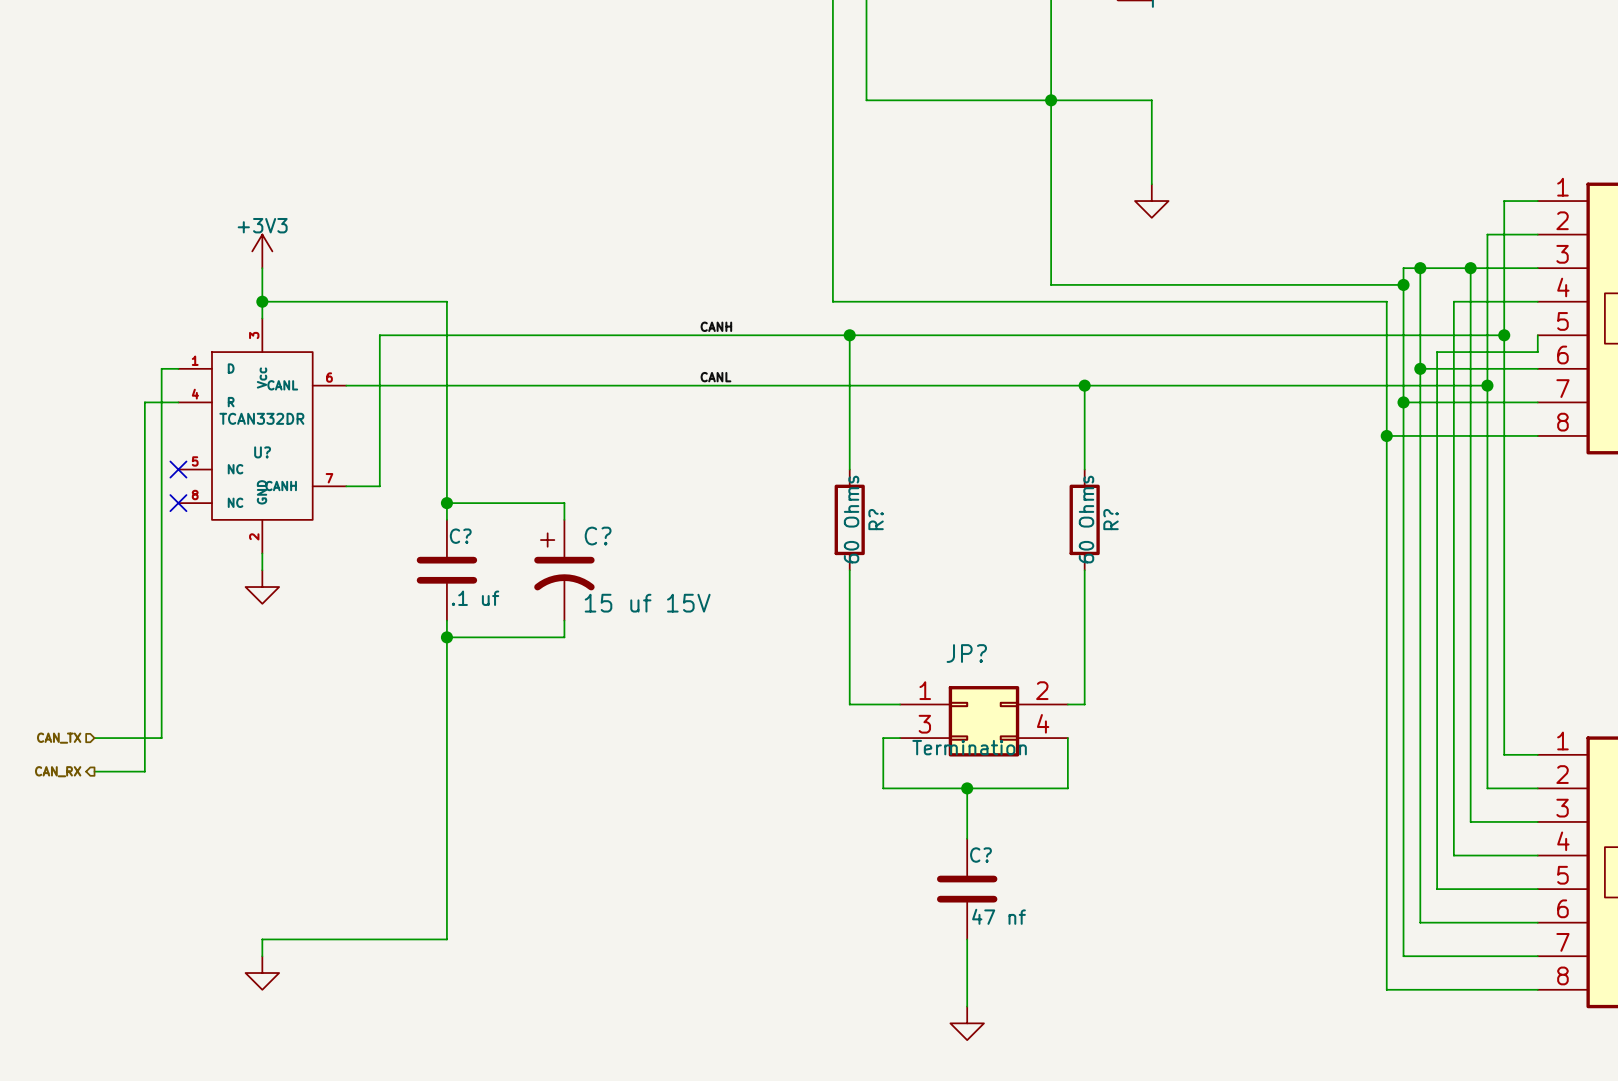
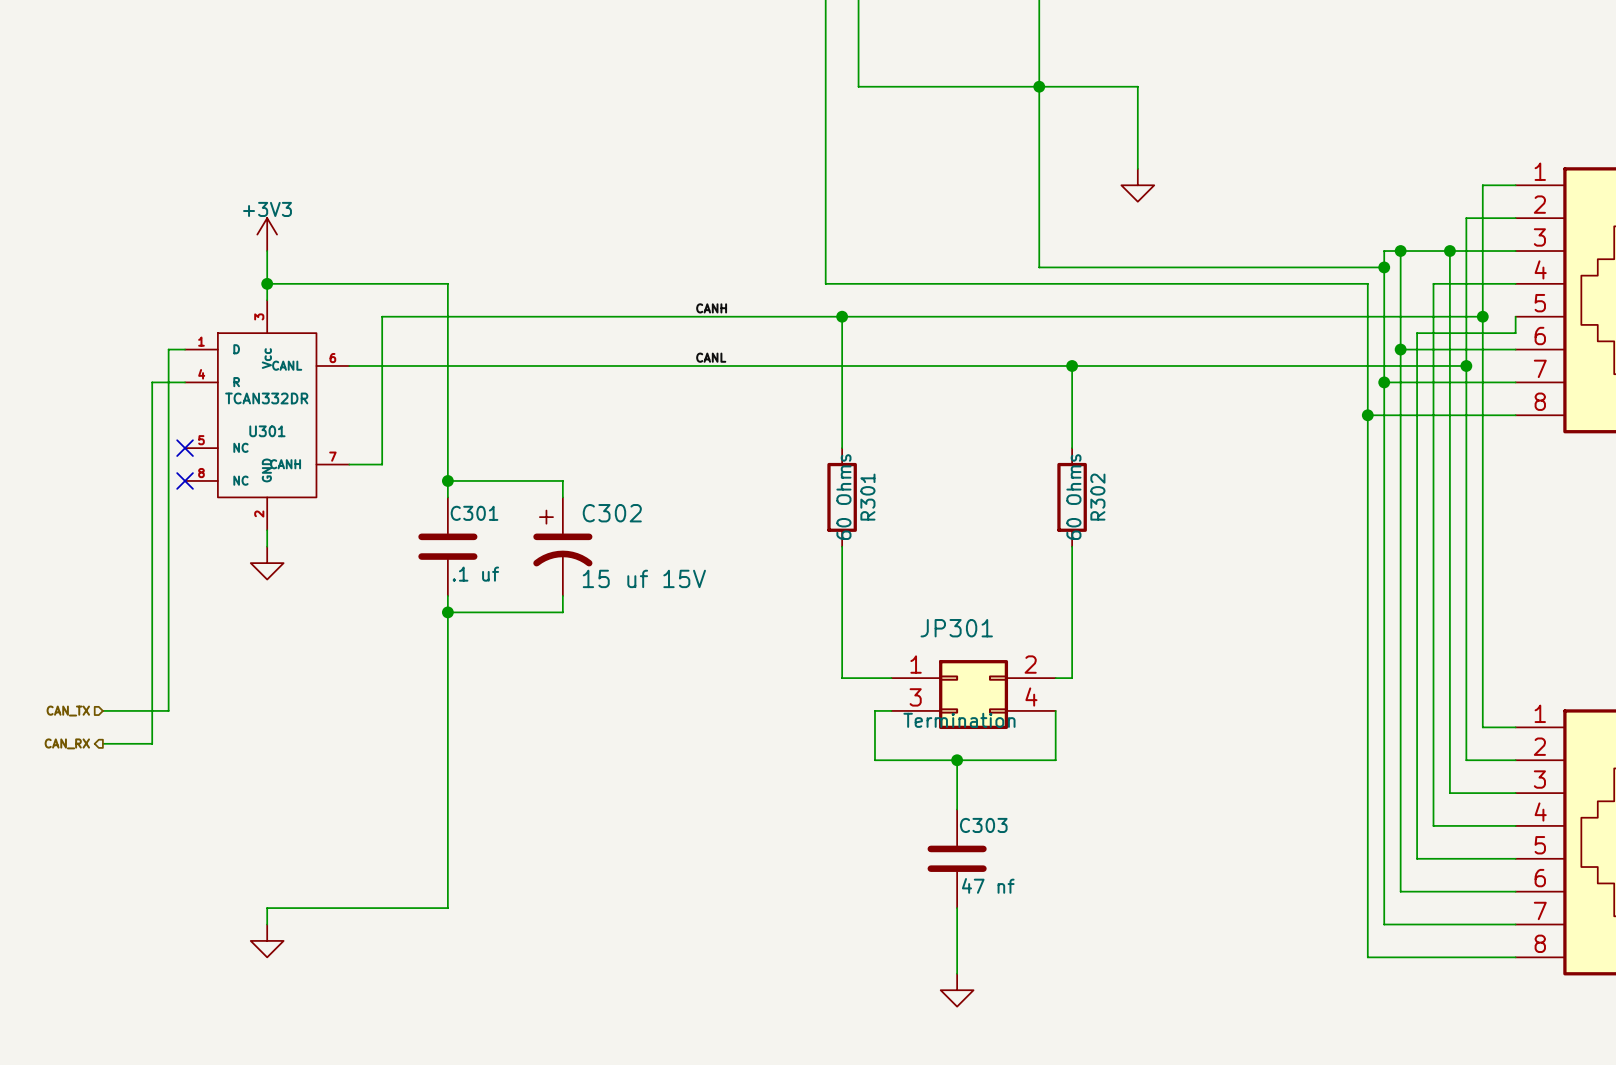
U? name: U? (262, 452) -> U301 (267, 431)
R? name: R? (876, 519) -> R301 (867, 497)
R? name: R? (1111, 519) -> R302 (1097, 497)
C? name: C? (460, 536) -> C301 (474, 513)
C? name: C? (598, 536) -> C302 (612, 513)
JP? name: JP? (966, 653) -> JP301 (956, 628)
C? name: C? (980, 855) -> C303 (983, 825)

